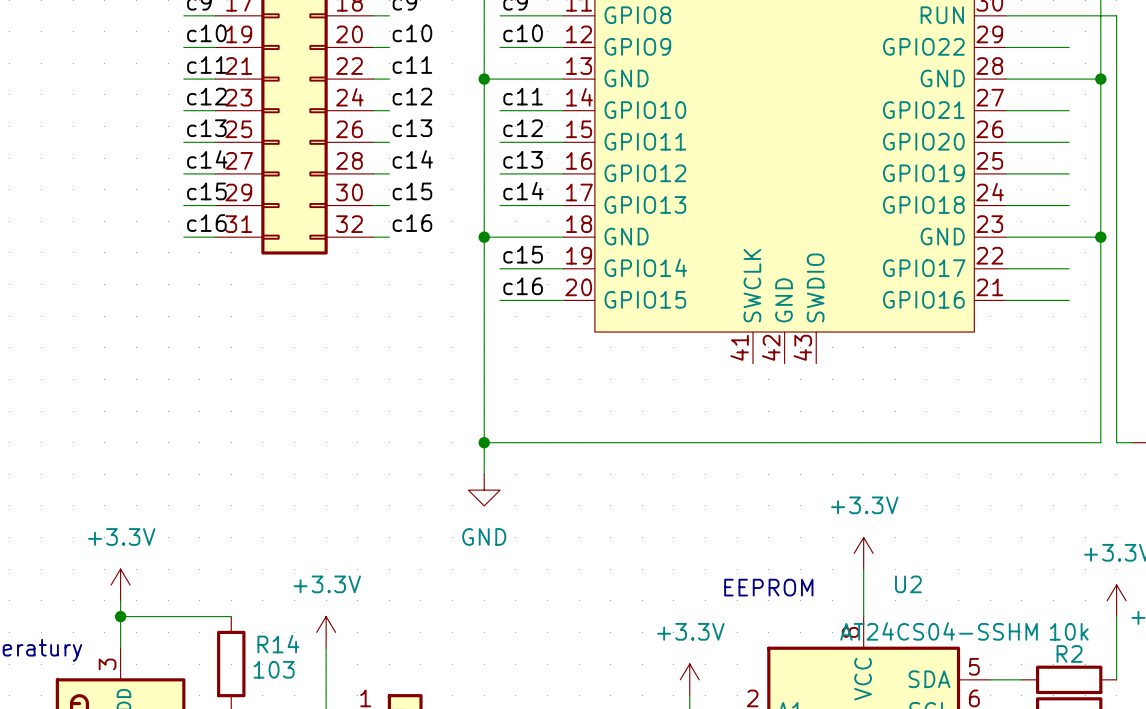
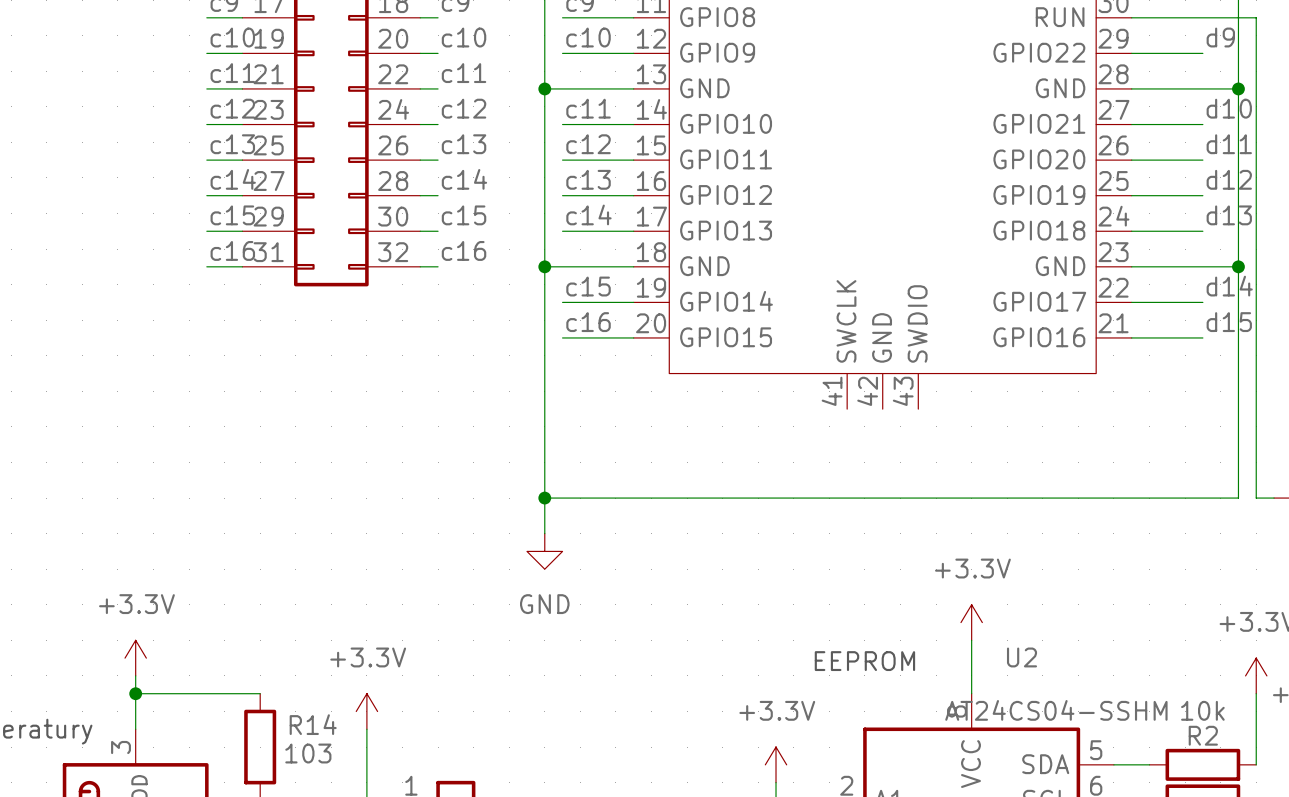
label: none -> d9 (1220, 37)
label: none -> d10 (1229, 108)
label: none -> d11 (1229, 144)
label: none -> d12 (1229, 179)
label: none -> d13 (1229, 215)
label: none -> d14 (1229, 286)
label: none -> d15 (1229, 322)

